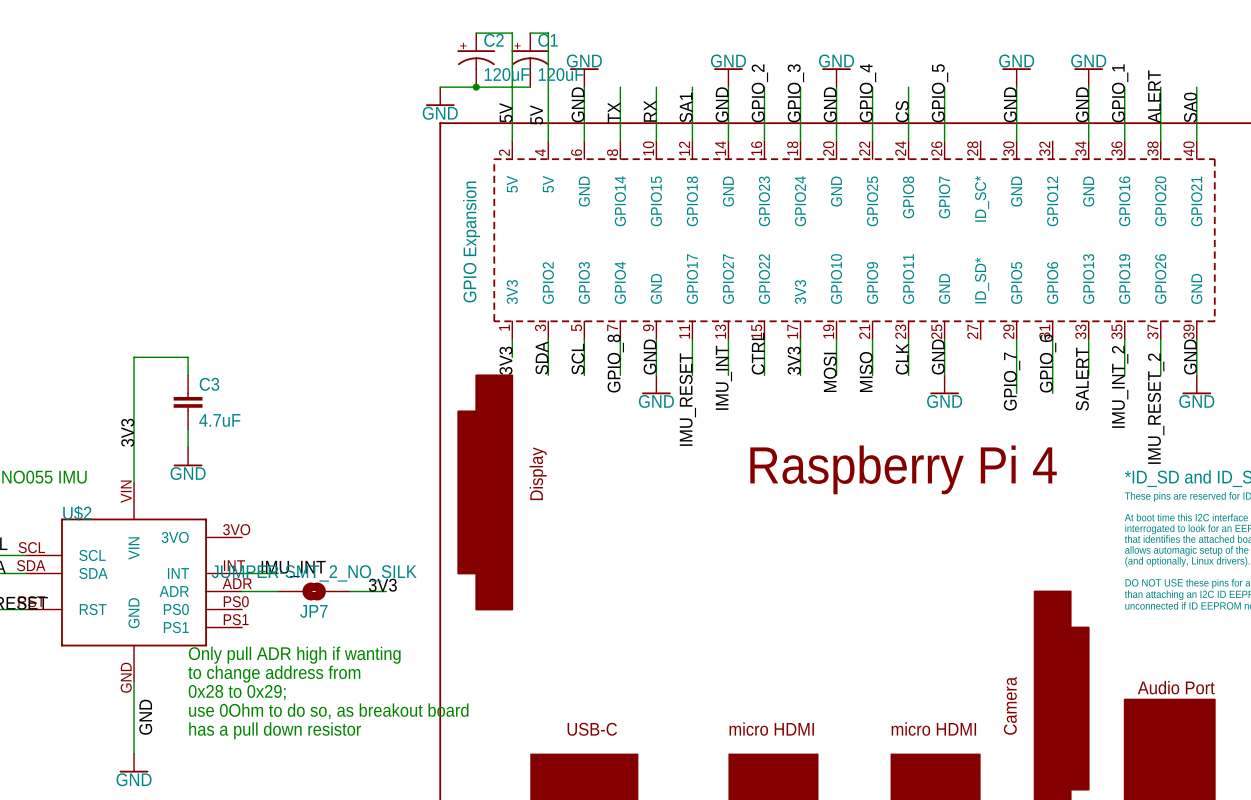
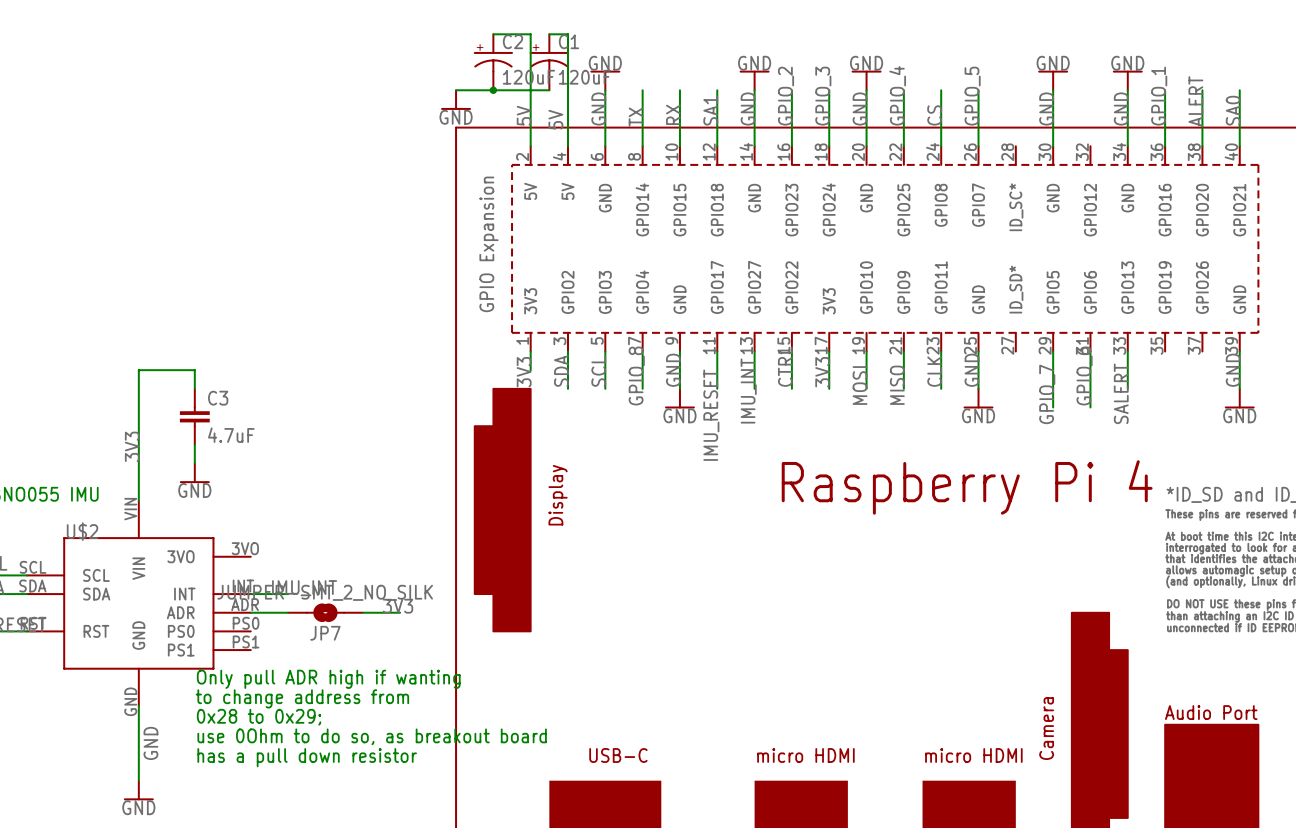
wire: (1124, 339) (1124, 375) -> none
wire: (1160, 339) (1160, 375) -> none
label: IMU_INT_2 (1120, 386) -> none
label: IMU_RESET_2 (1156, 408) -> none

